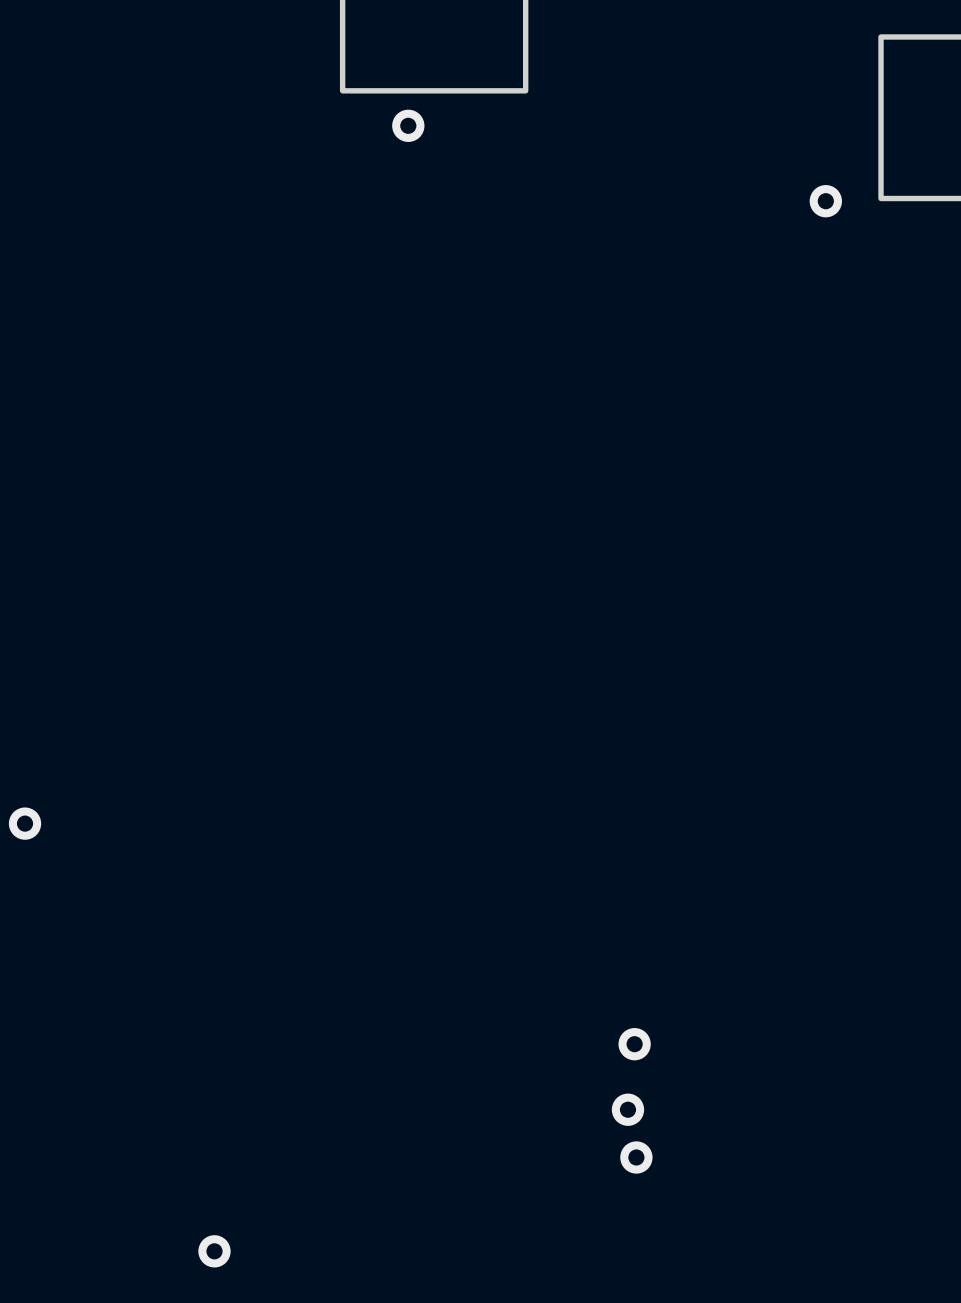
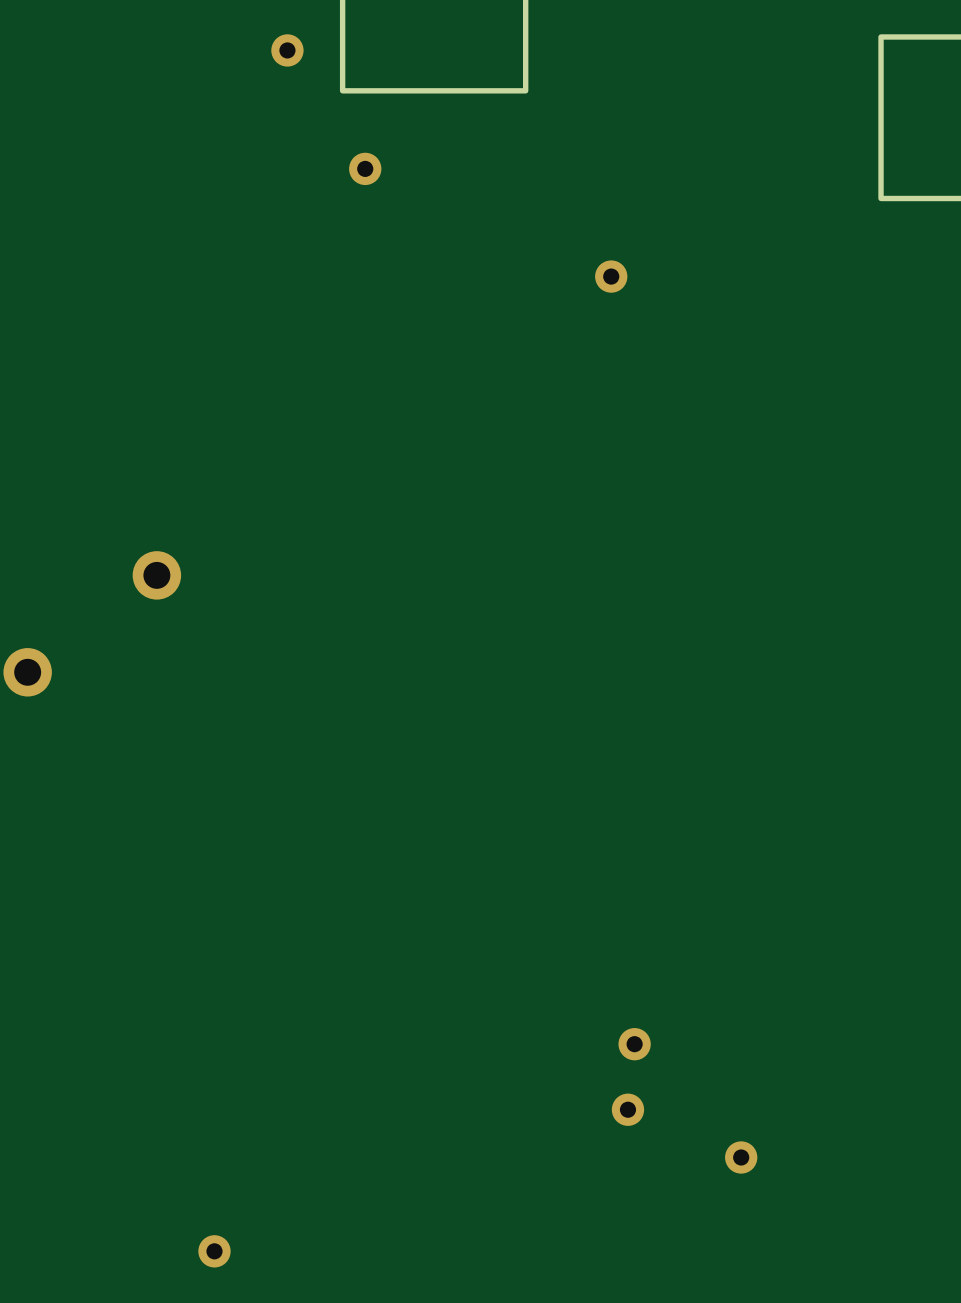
via: none -> (287, 50)
via position: (408, 125) -> (365, 168)
via: (825, 201) -> none
via: none -> (611, 276)
via: none -> (156, 575)
via: none -> (27, 672)
via: (25, 823) -> none
via position: (636, 1157) -> (741, 1157)

